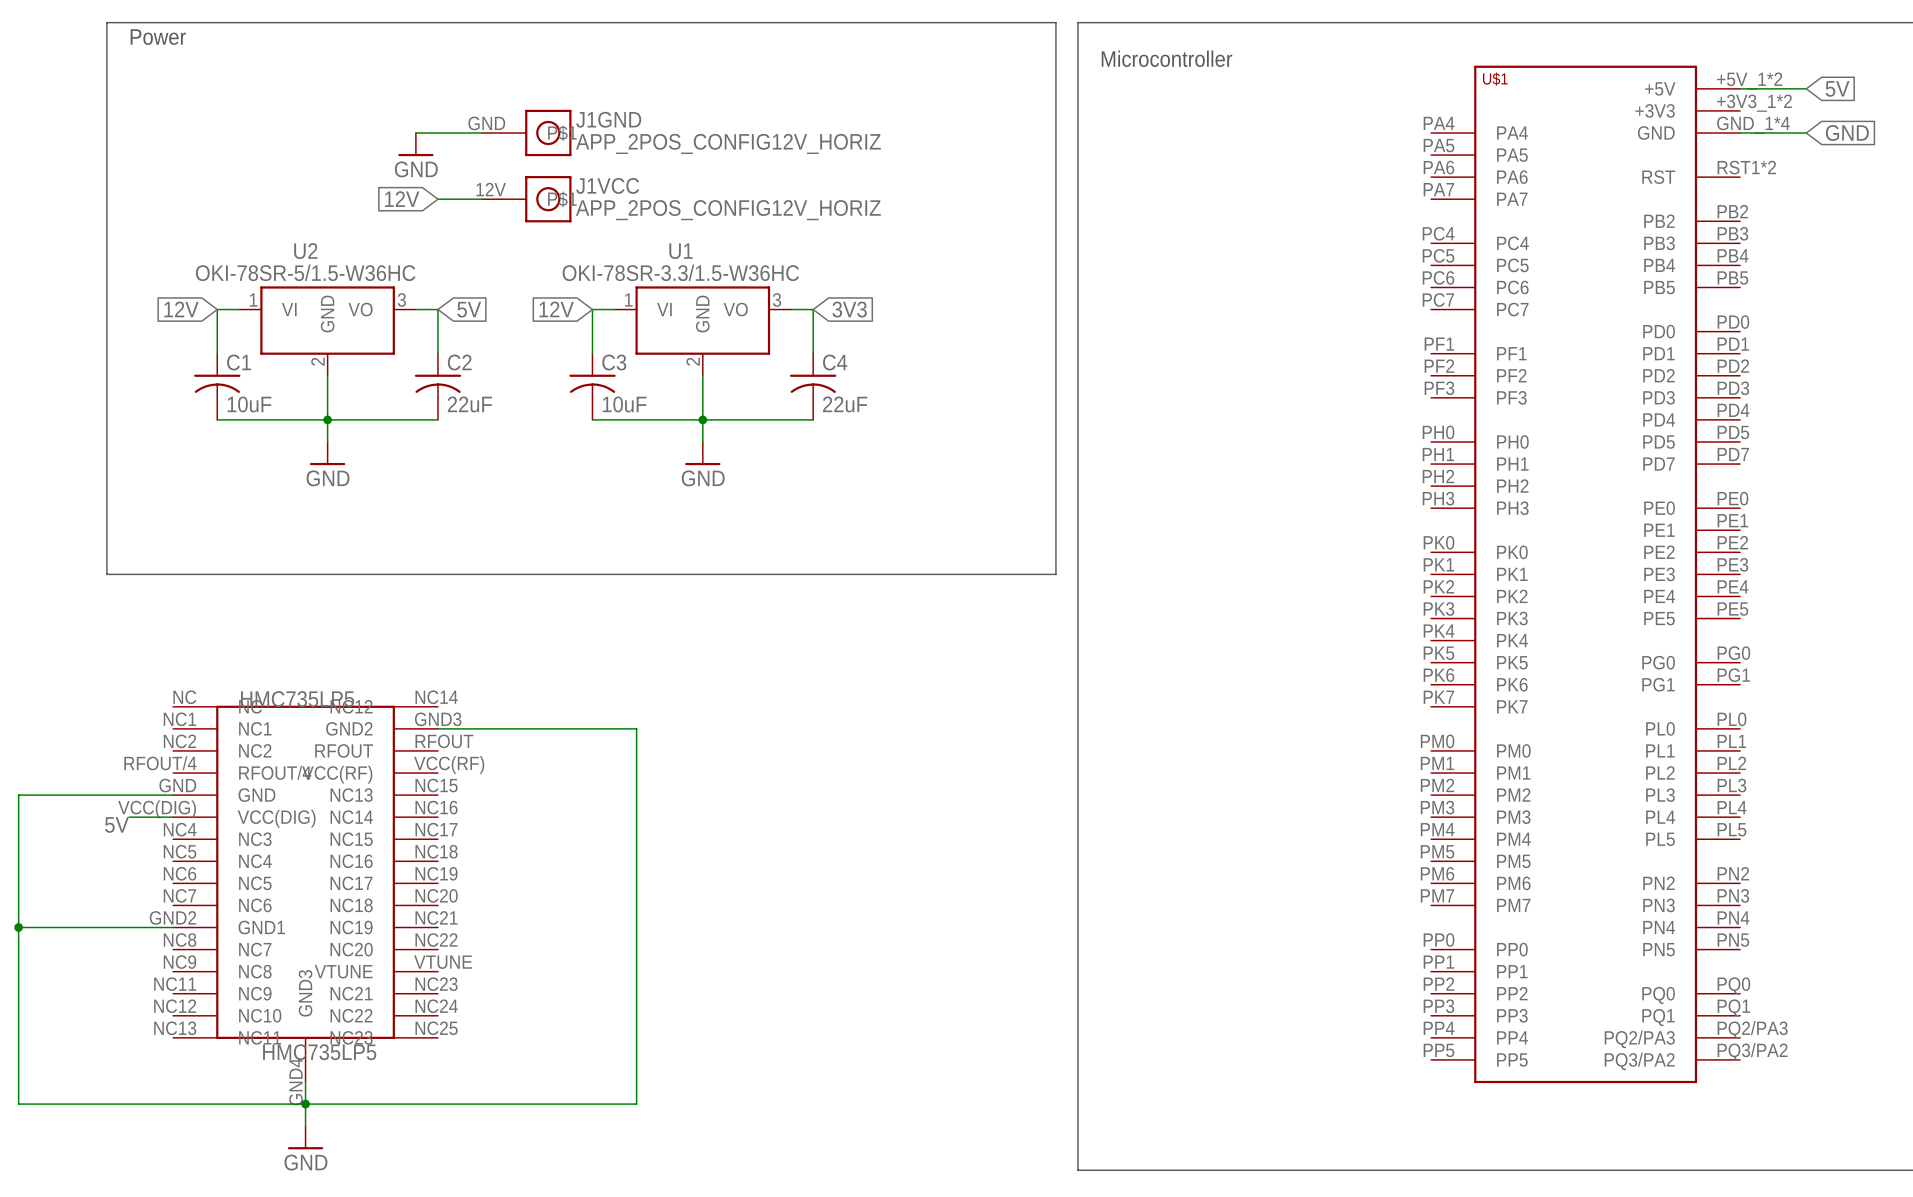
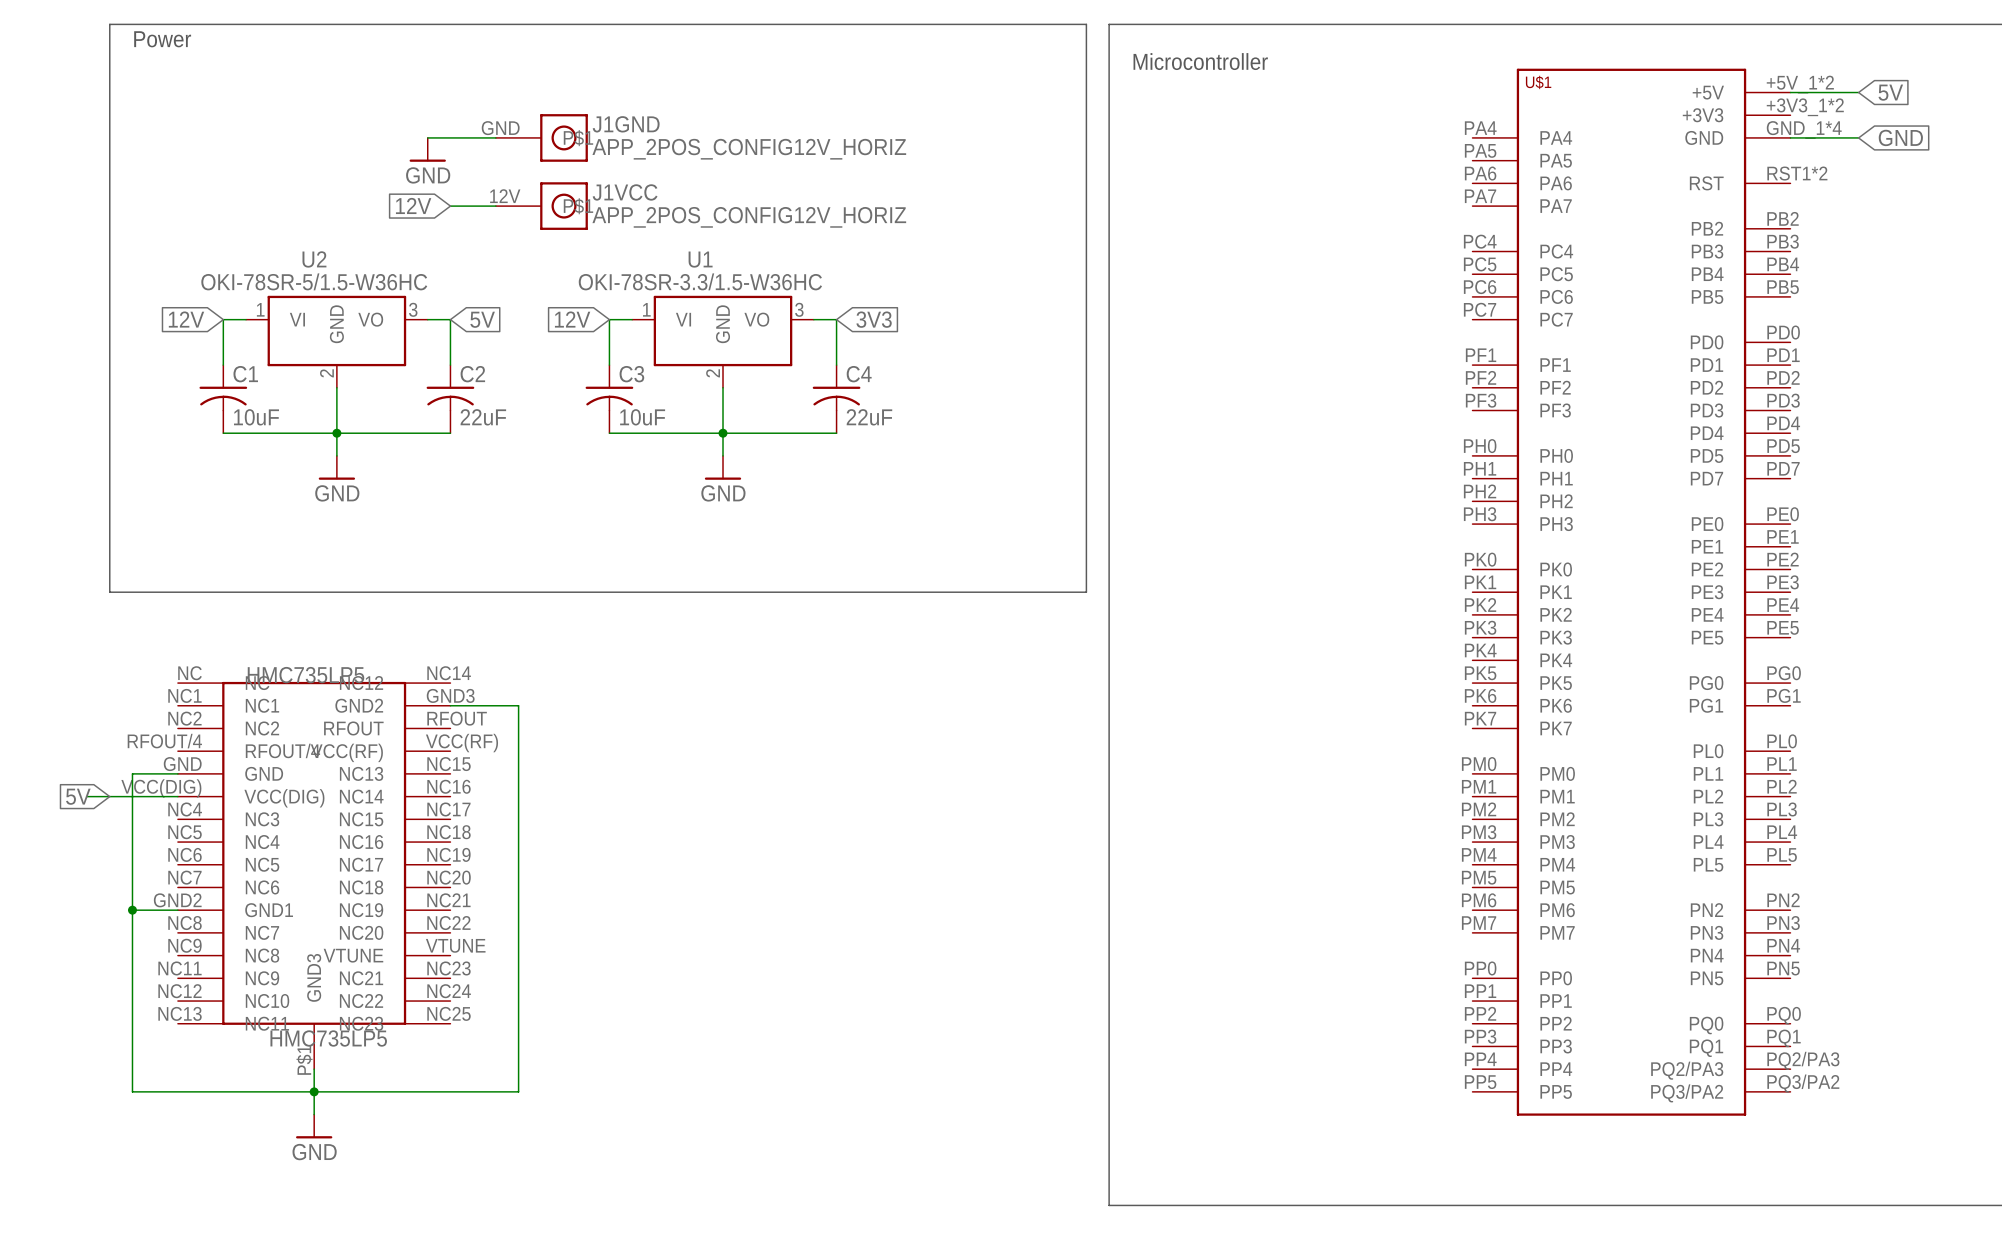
wire: none -> (450, 705) (518, 705) (518, 1091) (132, 1091) (132, 773) (177, 773)
wire: (437, 728) (636, 728) (636, 1104) (18, 1104) (18, 795) (173, 795) -> none
global label: none -> 5V (78, 796)
wire: none -> (87, 796) (177, 796)
wire: (128, 817) (173, 817) -> (132, 910) (177, 910)
label: 5V (116, 825) -> none
part: none -> HMC735LP5 (314, 875)
junction: none -> (132, 910)
part: HMC735LP5 (305, 893) -> none
wire: (18, 927) (173, 927) -> none
junction: (18, 927) -> none
junction position: (305, 1104) -> (314, 1091)
power symbol position: GND (305, 1137) -> GND (314, 1126)

